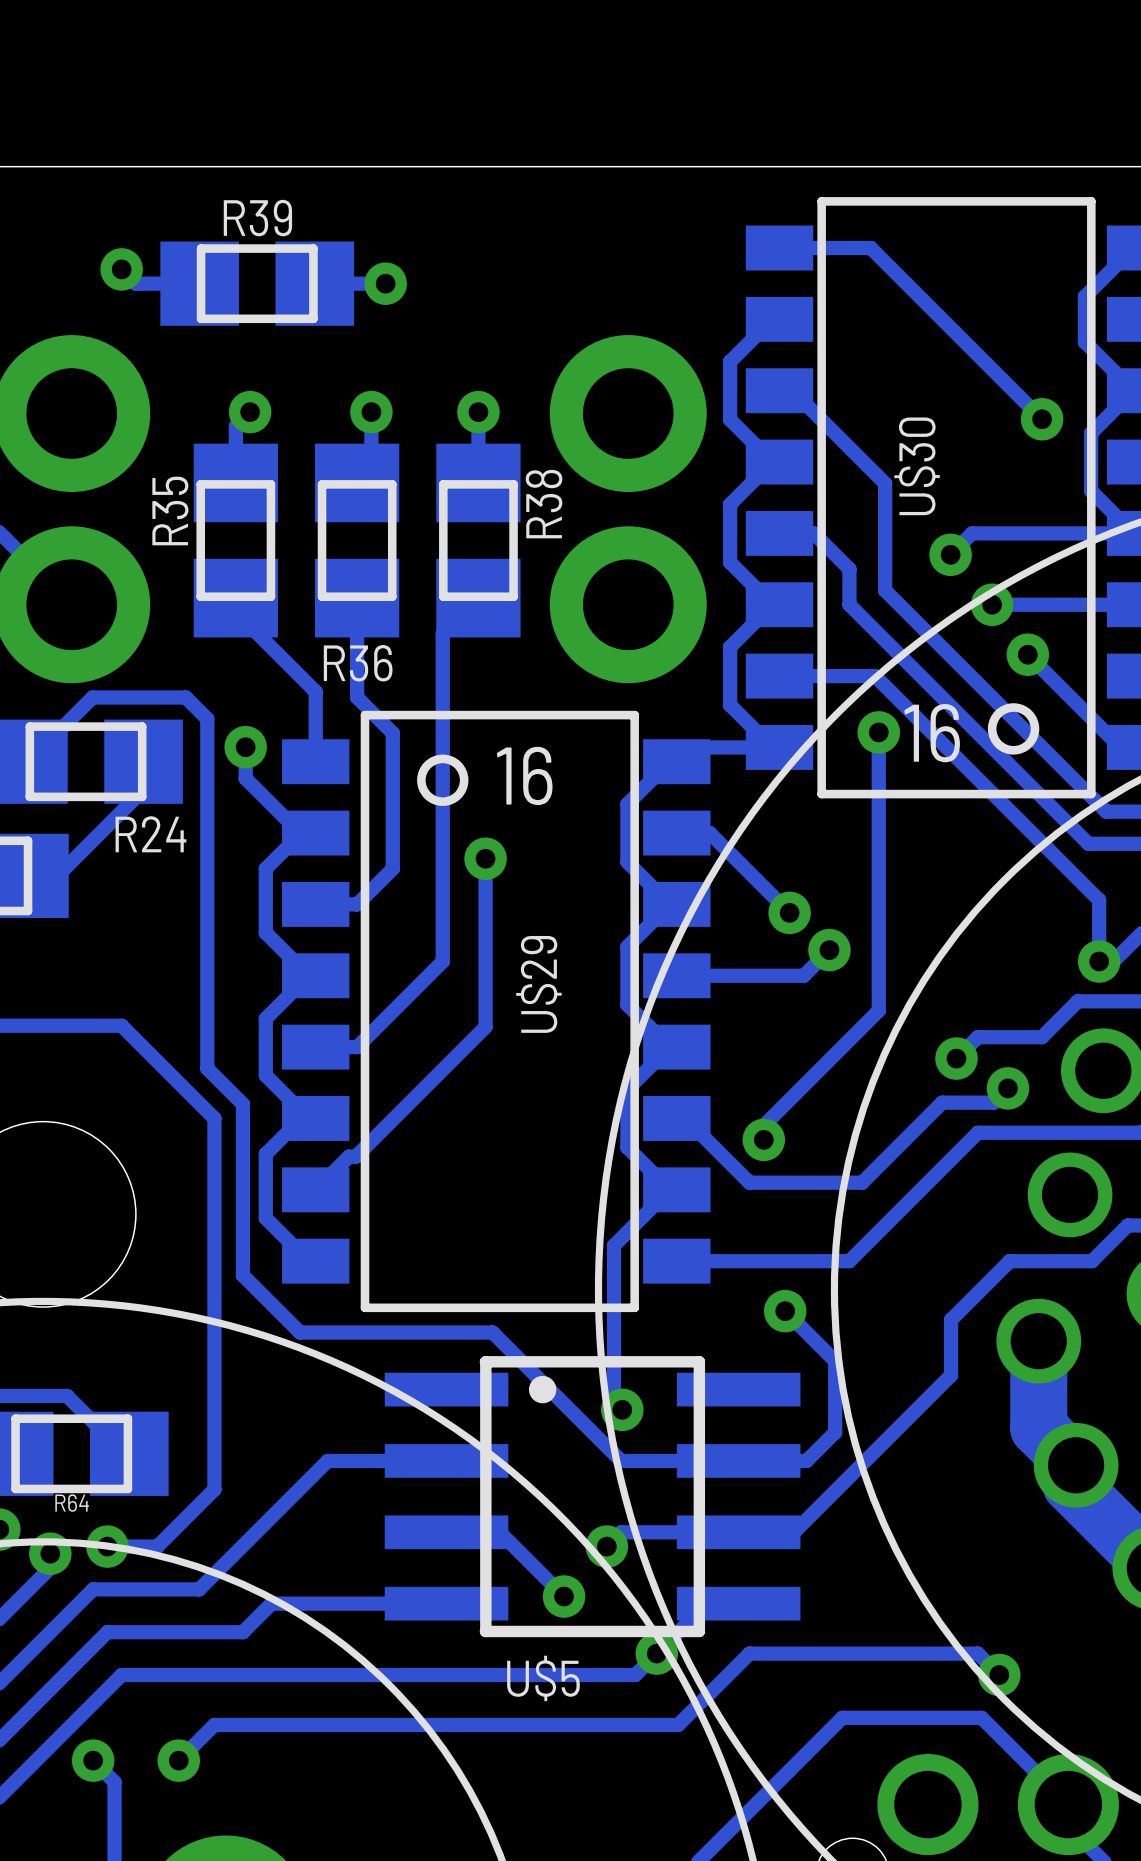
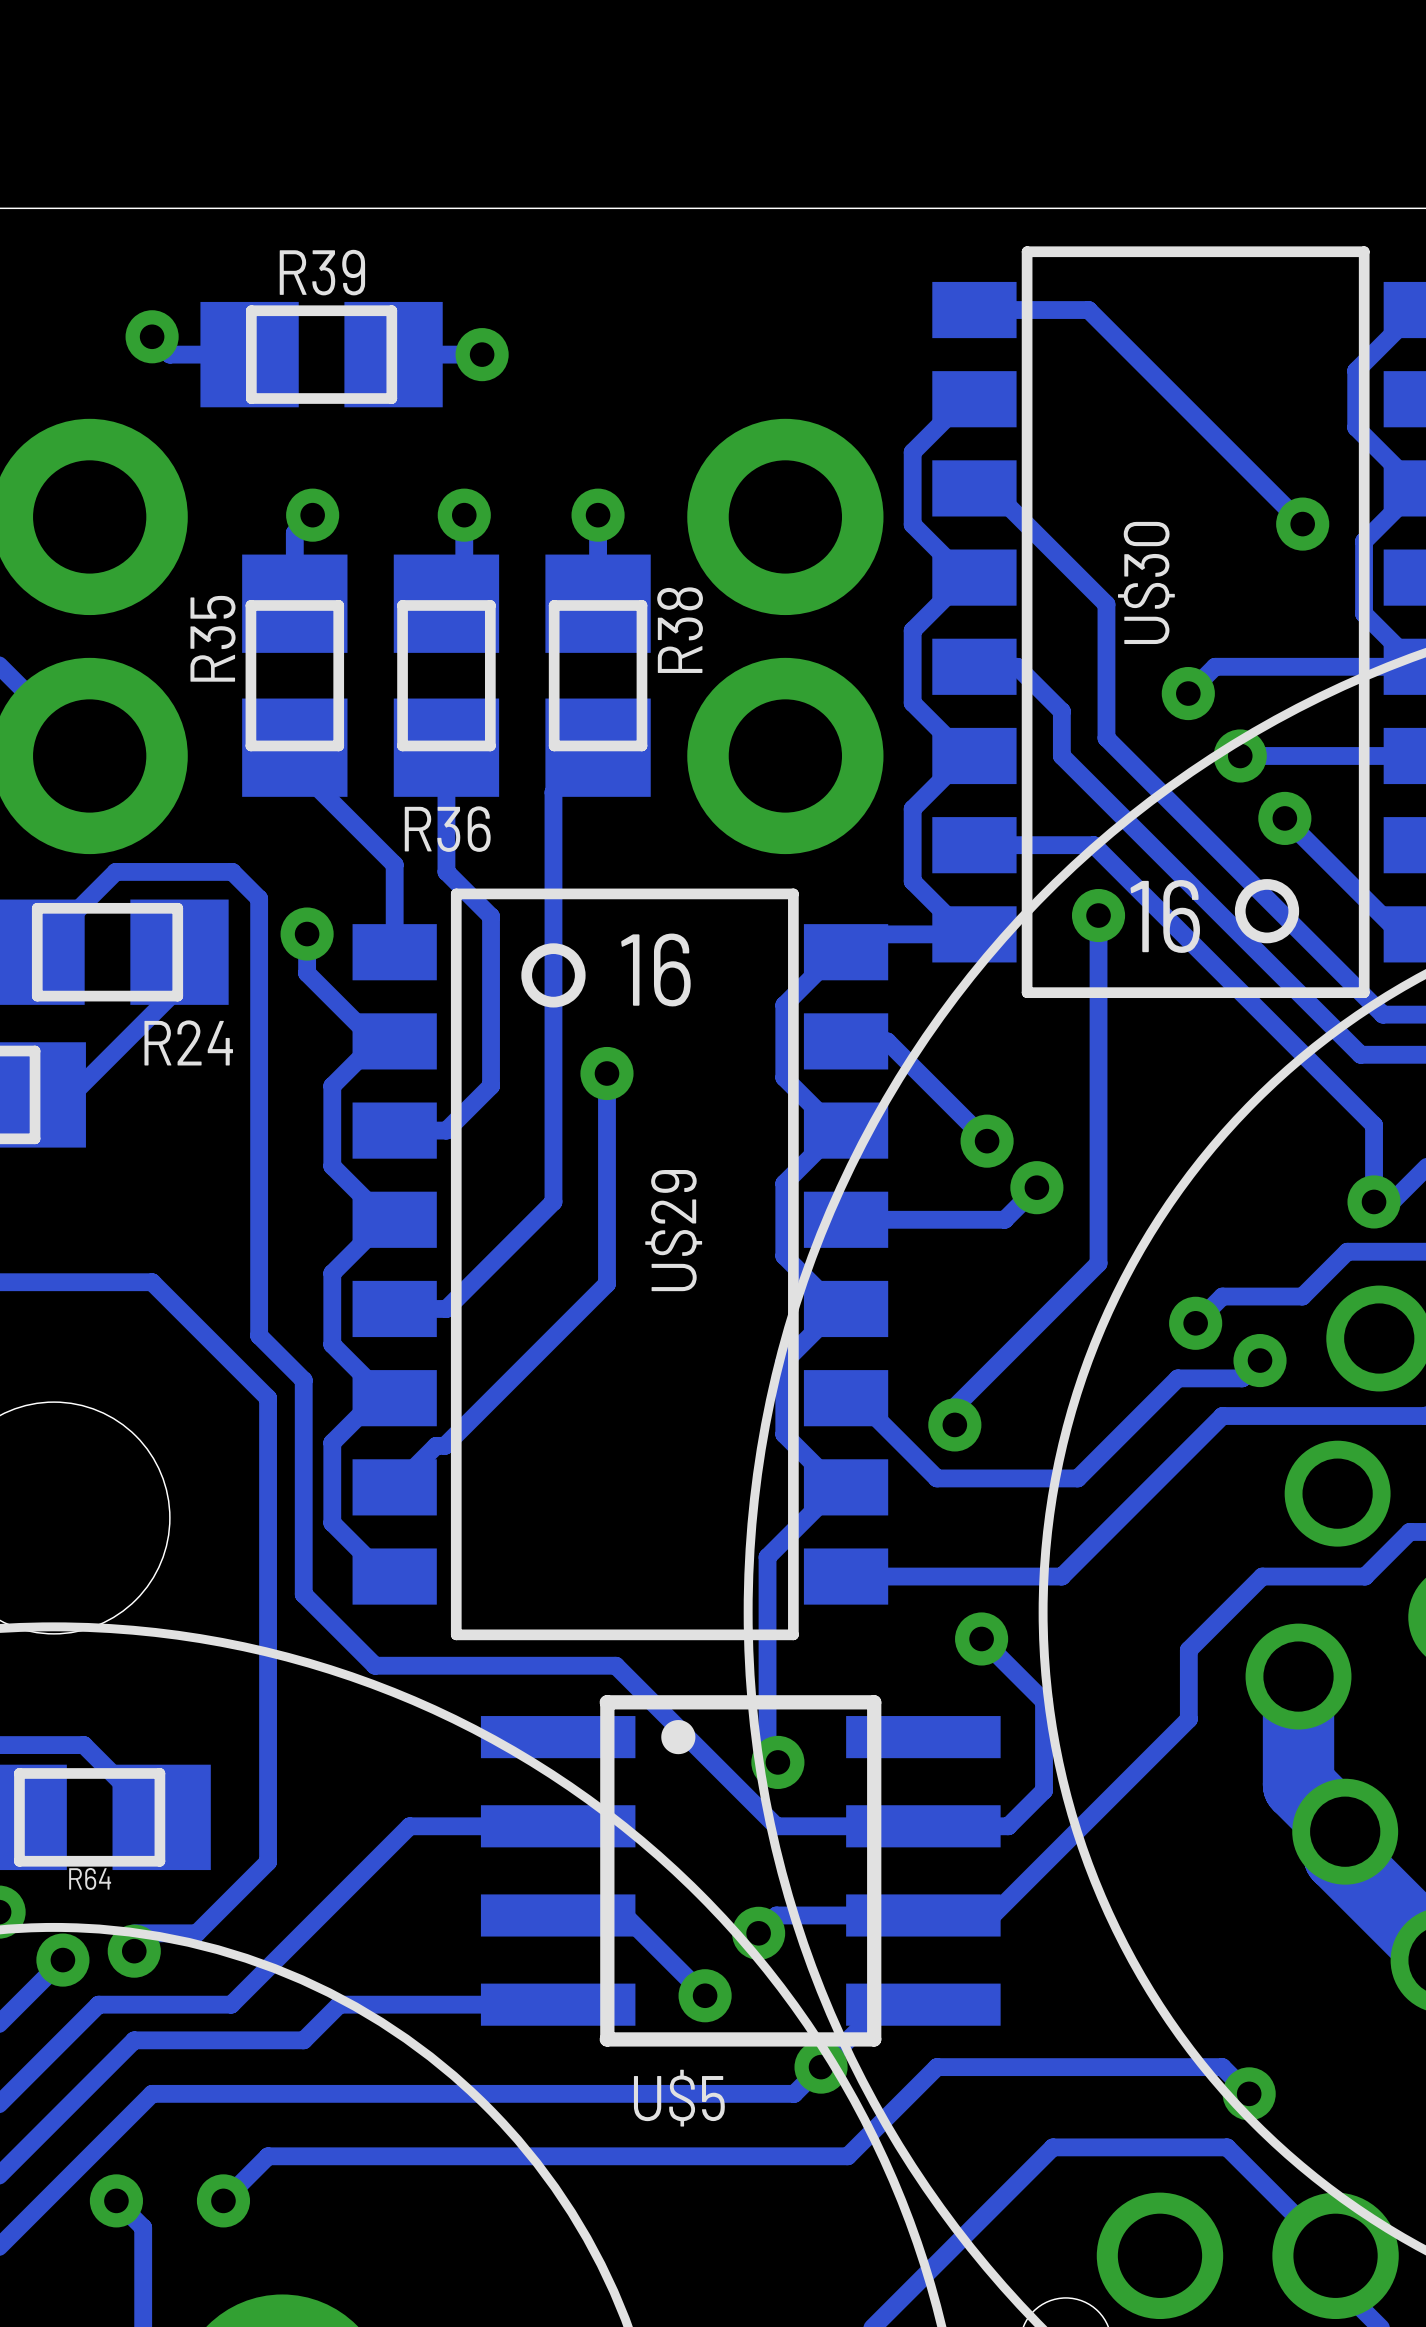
via position: (107, 1546) -> (134, 1951)
via position: (50, 1553) -> (62, 1960)
track: (199, 1589) (93, 1589) (78, 1603) -> (249, 1986) (231, 2004) (98, 2004)

